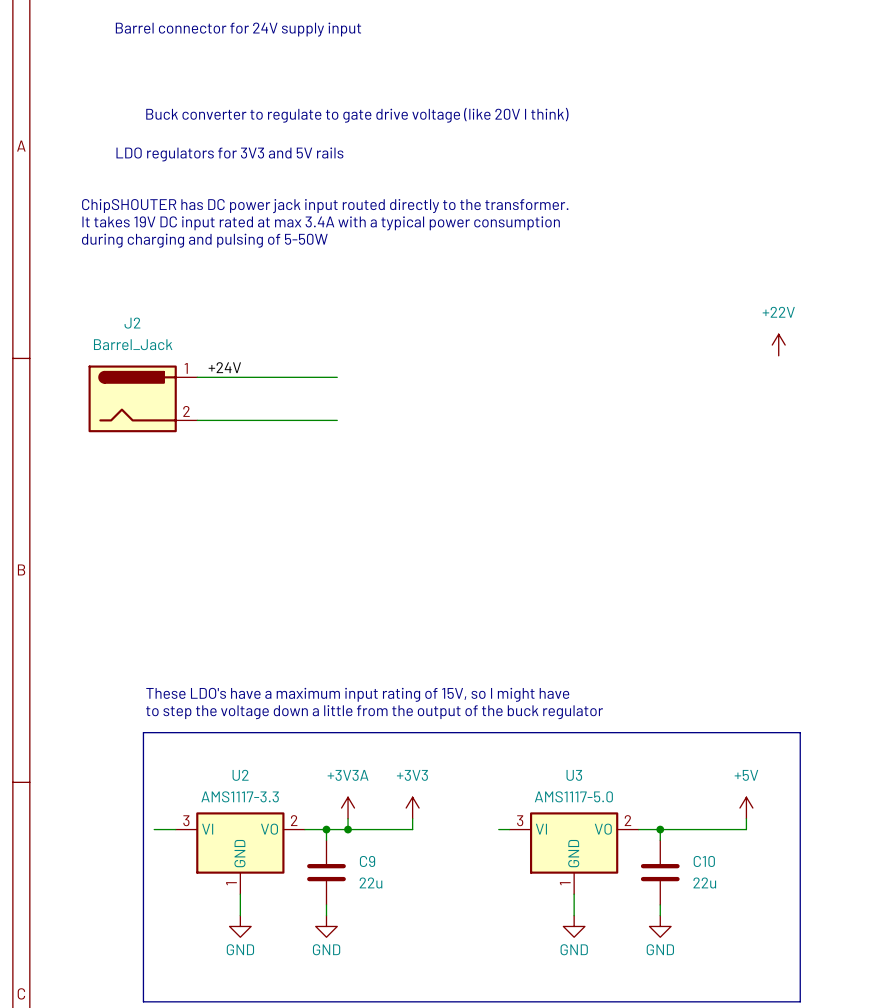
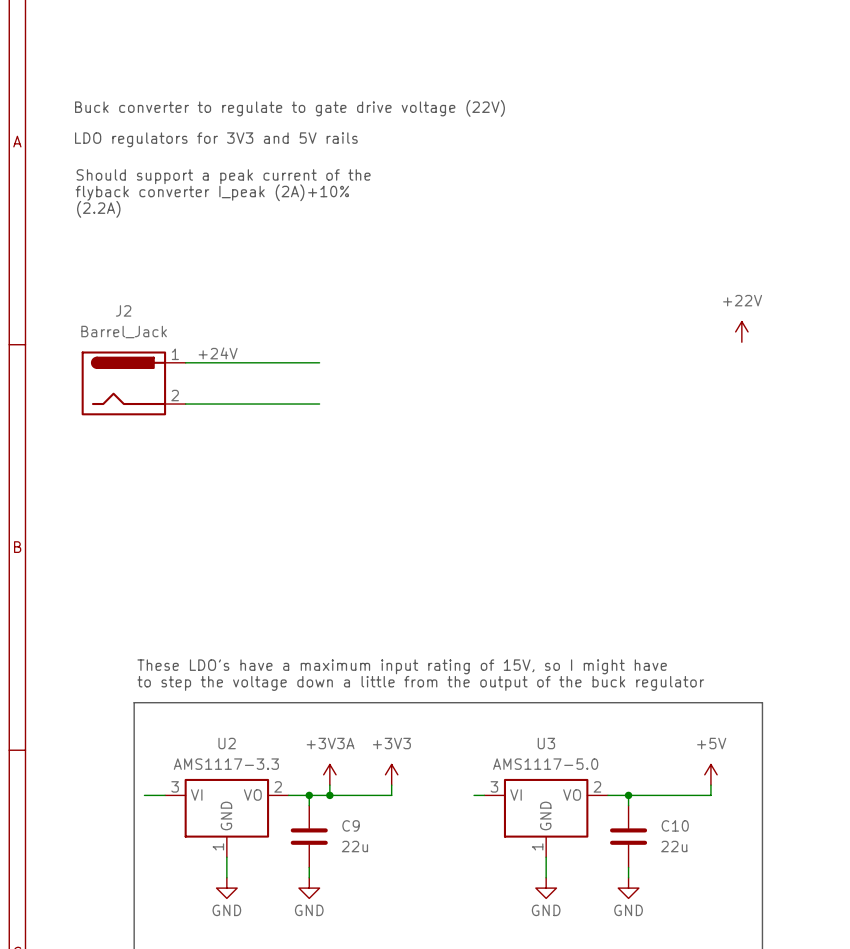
text: Barrel connector for 24V supply input (238, 29) -> none
text: none -> Buck converter to regulate to gate drive voltage (22V) (289, 108)
text: Buck converter to regulate to gate drive voltage (like 20V I think) (357, 115) -> none
text position: LDO regulators for 3V3 and 5V rails (229, 154) -> LDO regulators for 3V3 and 5V rails (216, 139)
text: none -> Should support a peak current of the (223, 176)
text: ChipSHOUTER has DC power jack input routed directly to the transformer. (325, 206) -> flyback converter I_peak (2A)+10% (212, 192)
text: It takes 19V DC input rated at max 3.4A with a typical power consumption (321, 223) -> (2.2A) (98, 209)
text: during charging and pulsing of 5-50W (204, 240) -> none

